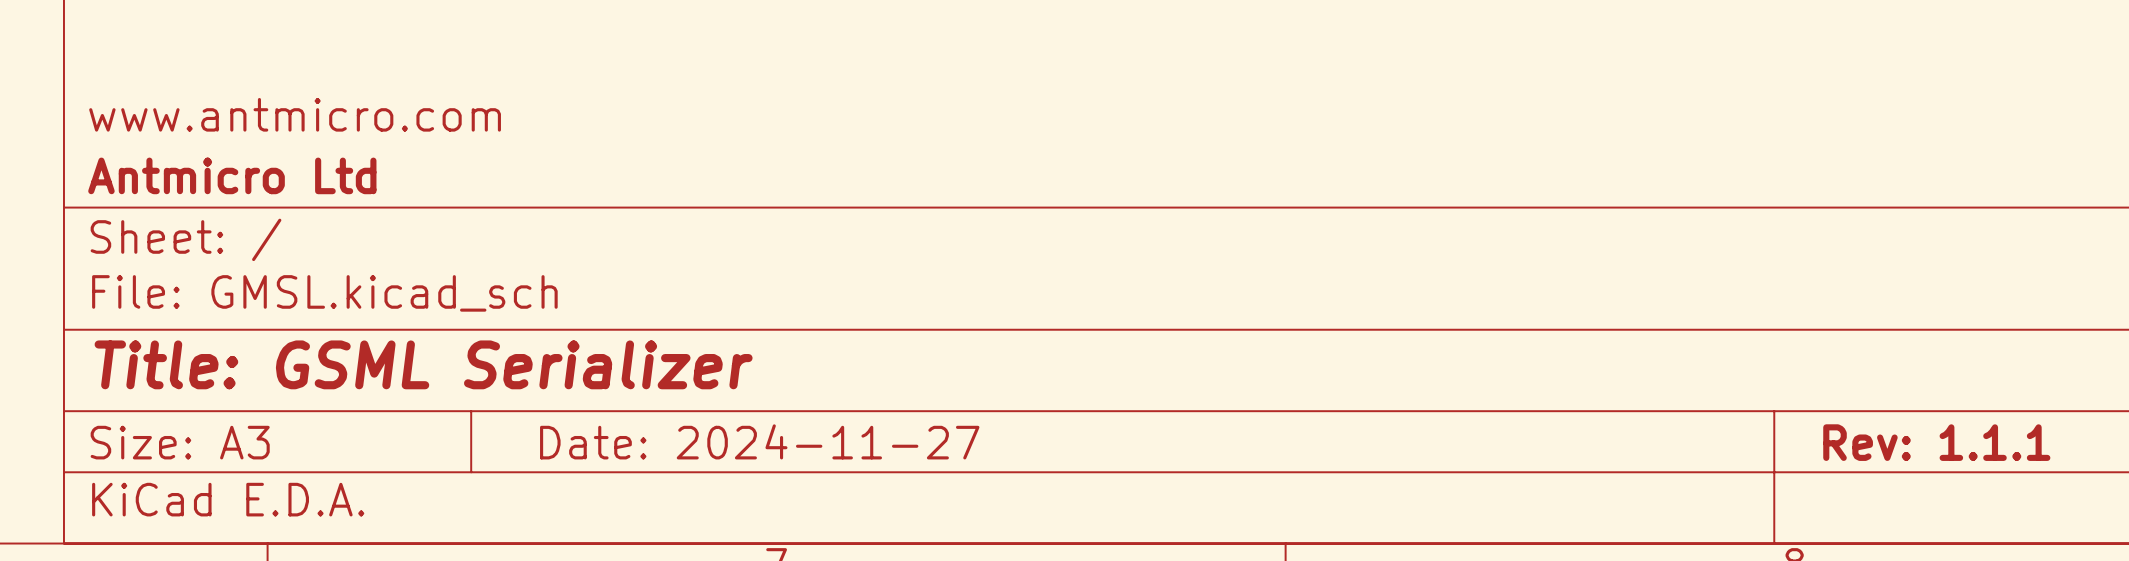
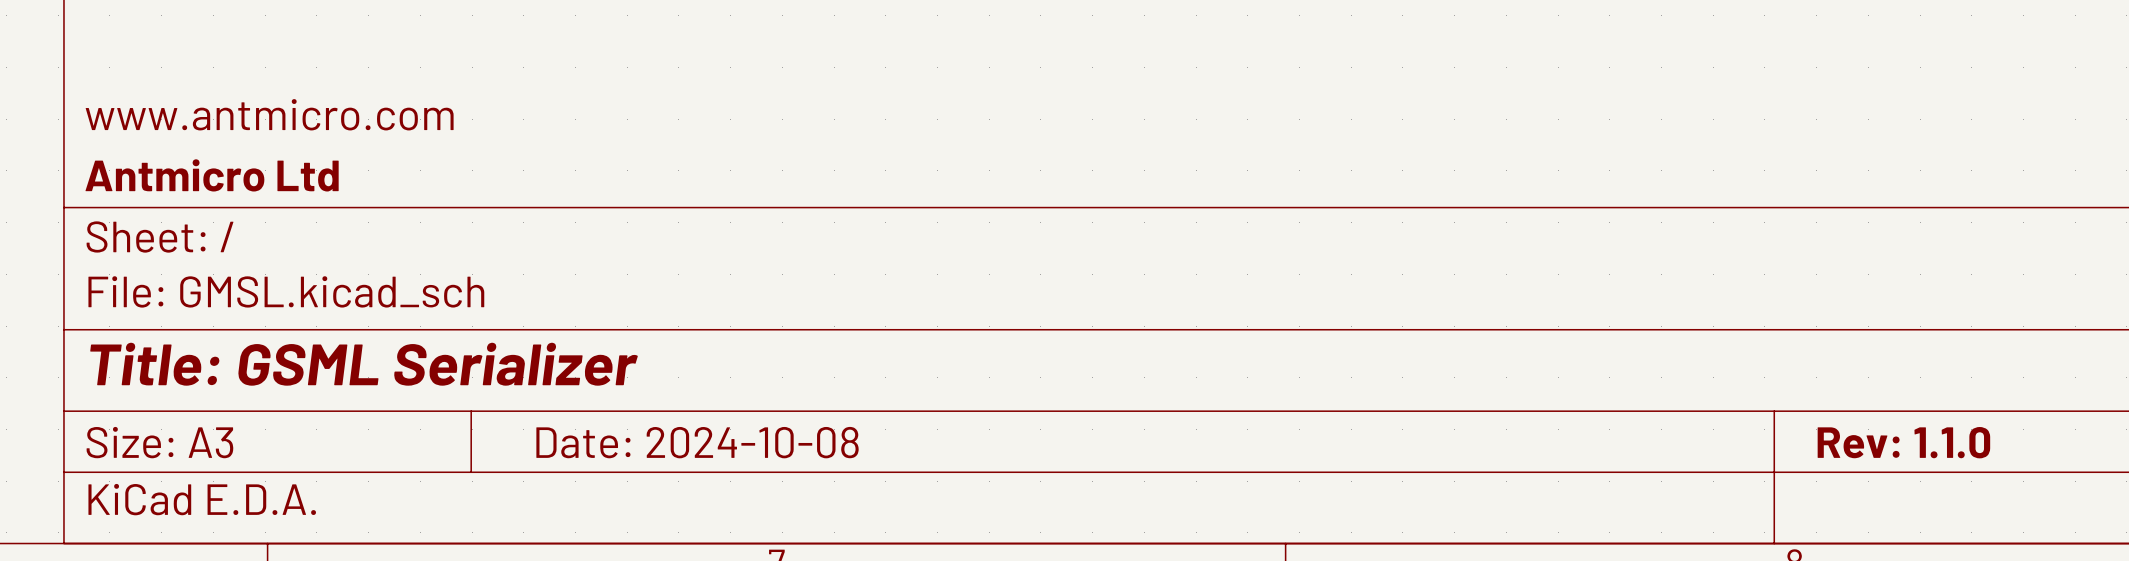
title block: Date: 2024-11-27 (759, 441) -> Date: 2024-10-08 (697, 442)
title block: Rev: 1.1.1 (1936, 442) -> Rev: 1.1.0 (1903, 442)

